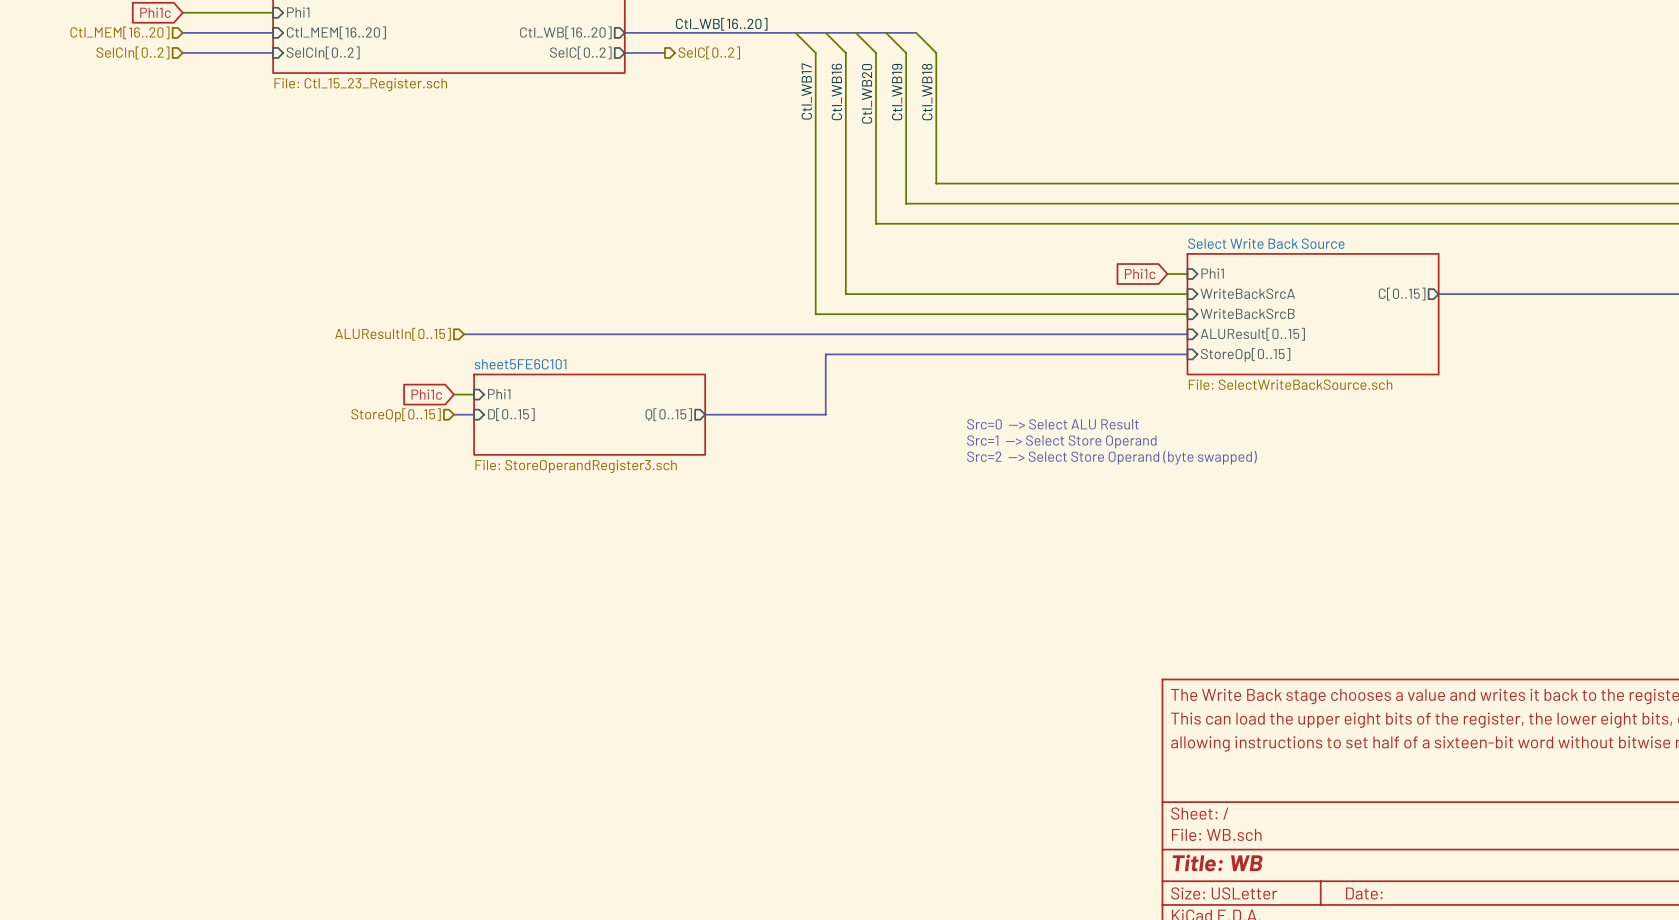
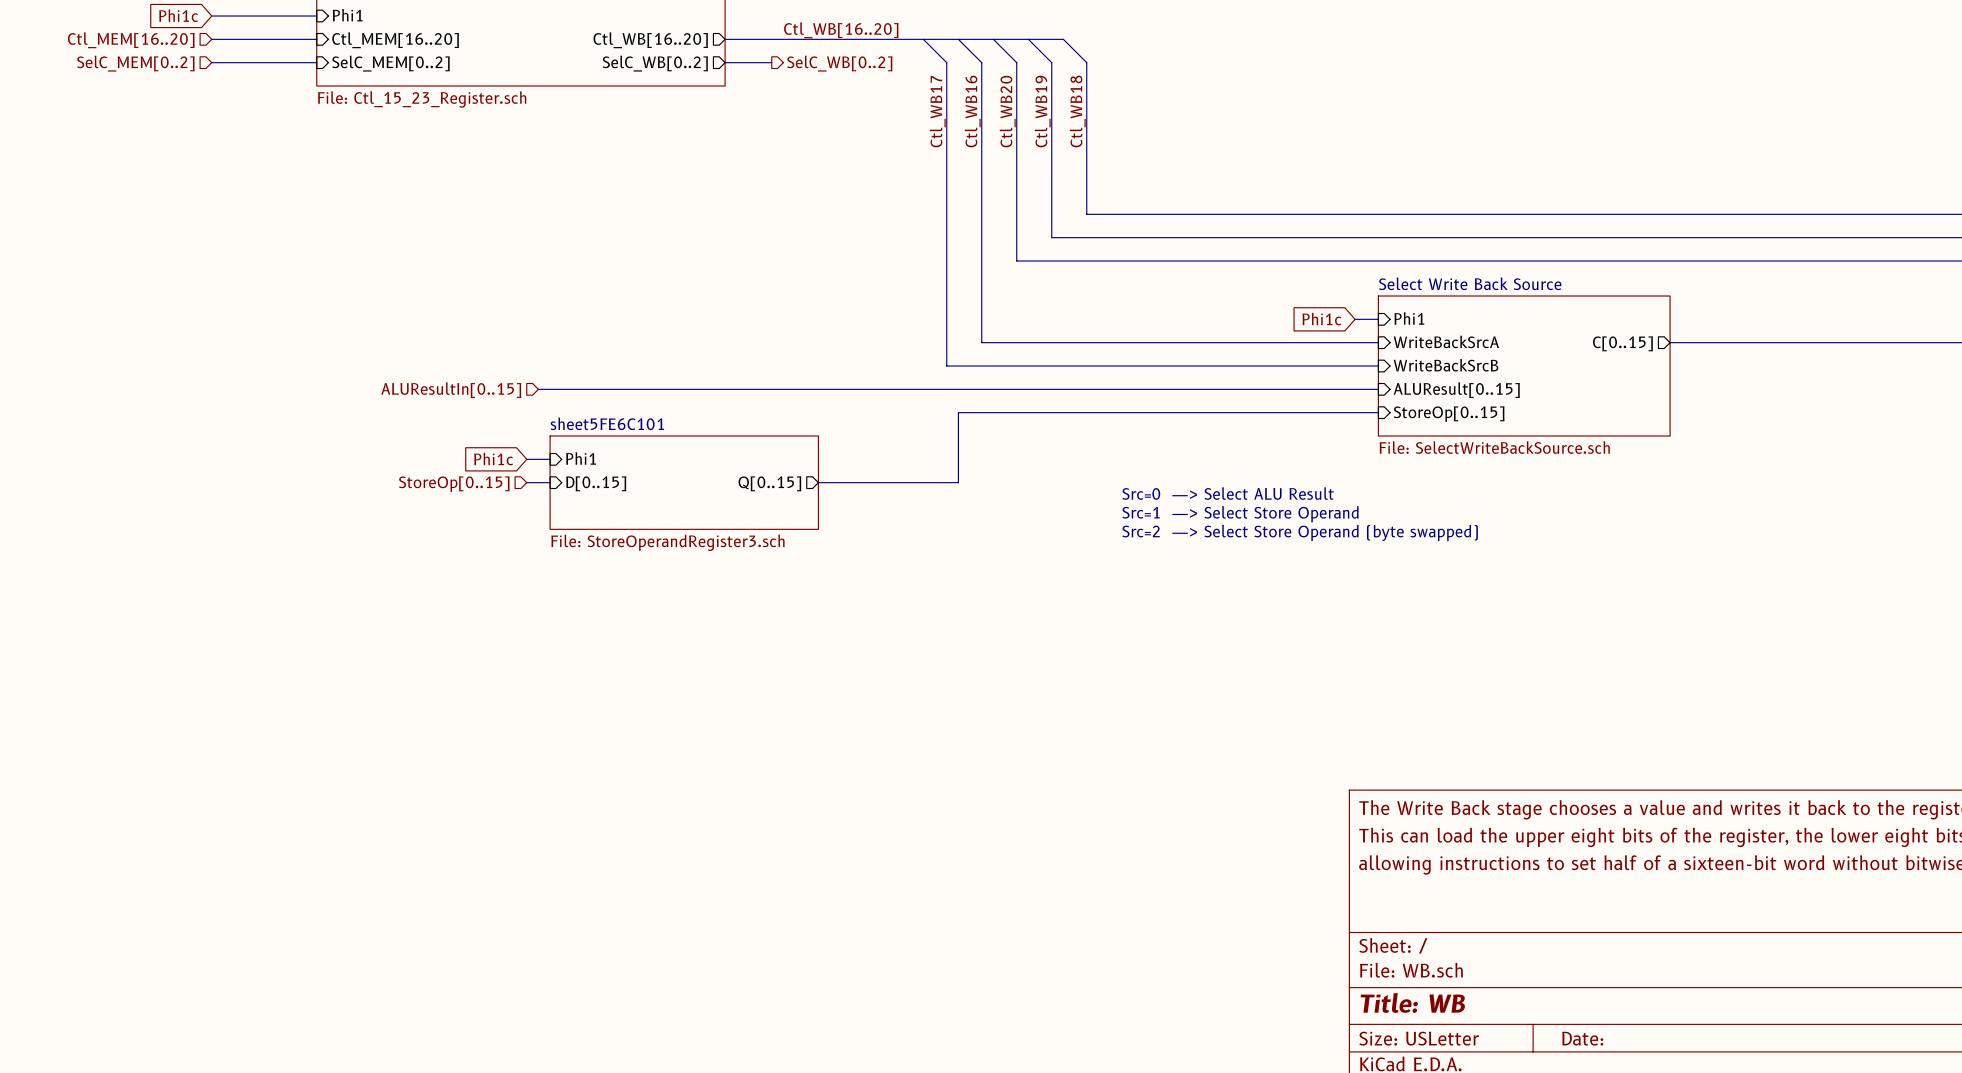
hierarchical label: SelCIn[0..2] (132, 52) -> SelC_MEM[0..2] (135, 63)
sheet pin: SelCIn[0..2] (323, 52) -> SelC_MEM[0..2] (390, 63)
sheet pin: SelC[0..2] (580, 52) -> SelC_WB[0..2] (655, 63)
hierarchical label: SelC[0..2] (709, 52) -> SelC_WB[0..2] (839, 63)

